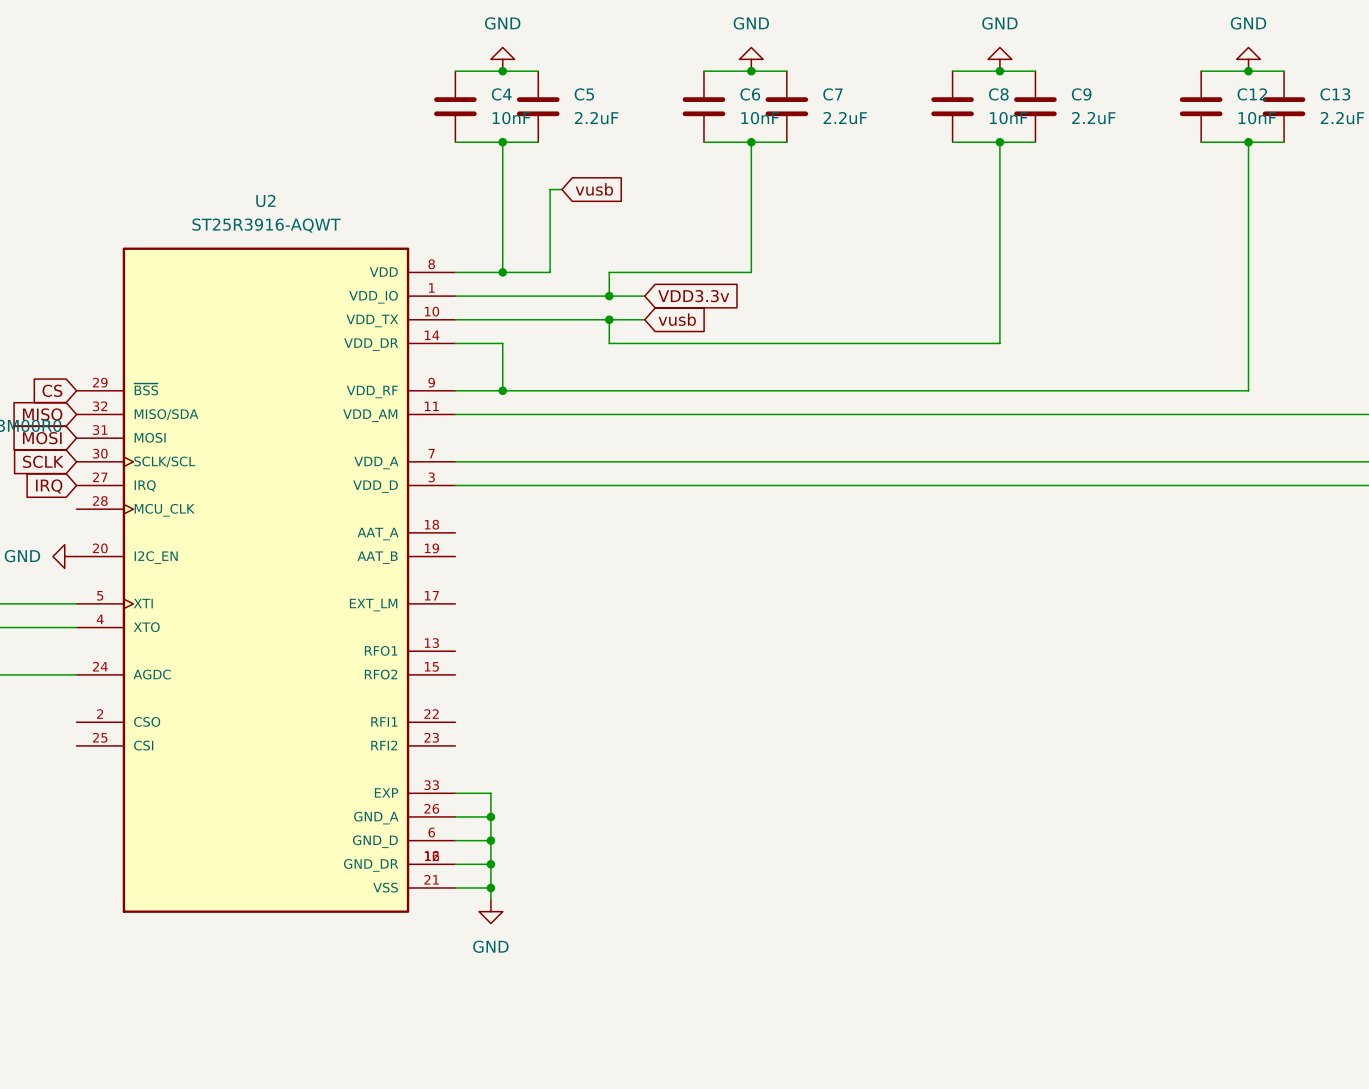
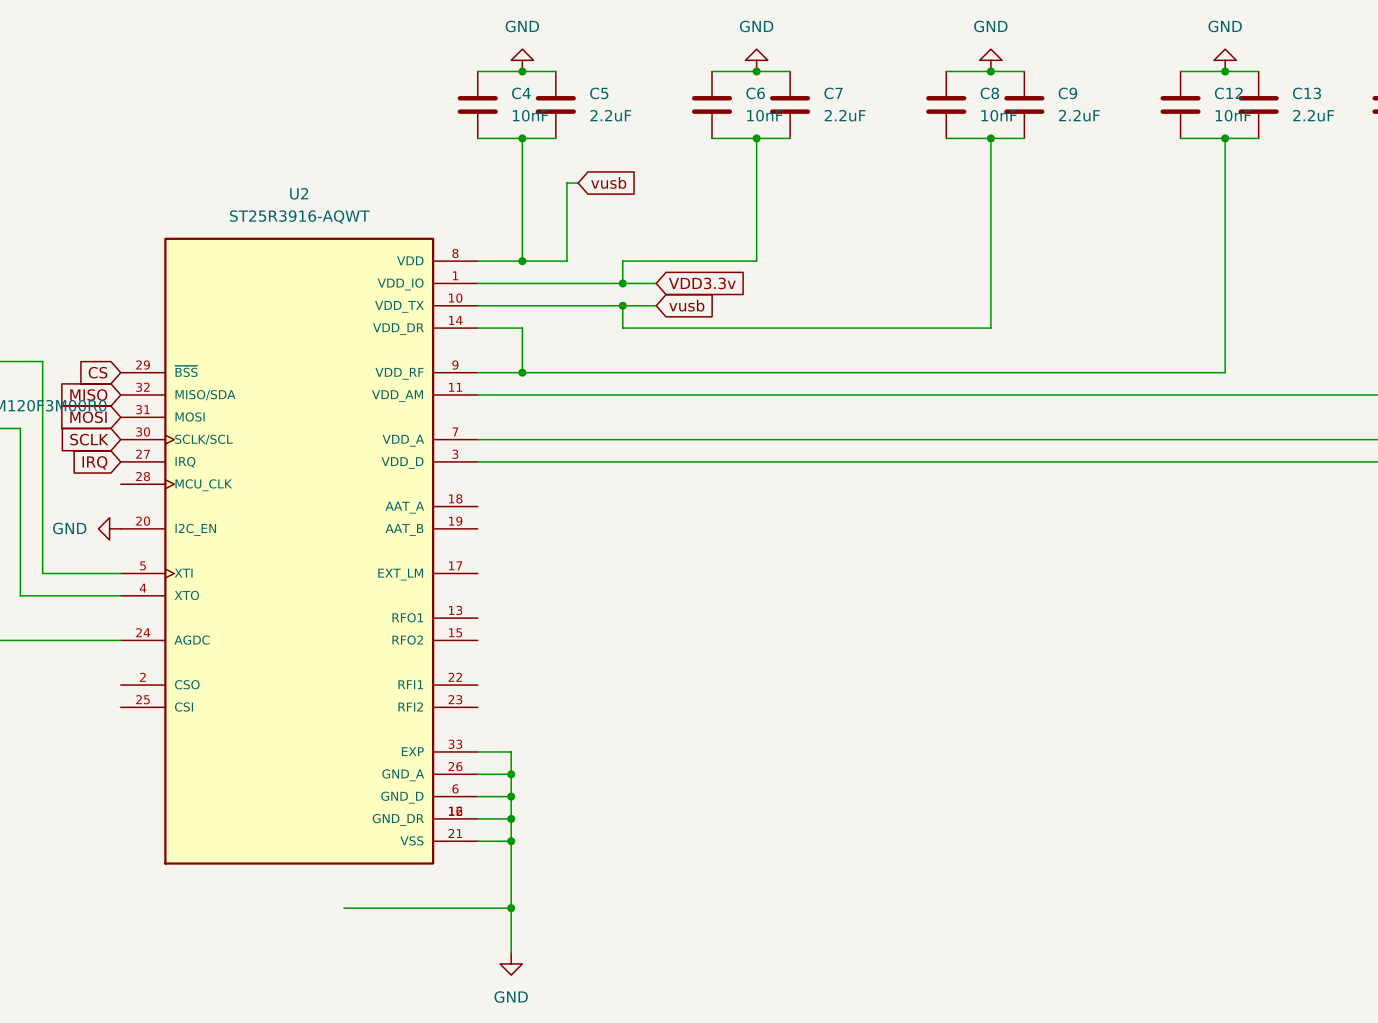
wire: none -> (511, 852) (511, 952)
power symbol position: GND (490, 911) -> GND (511, 963)
wire: none -> (343, 908) (511, 908)
junction: none -> (511, 908)

